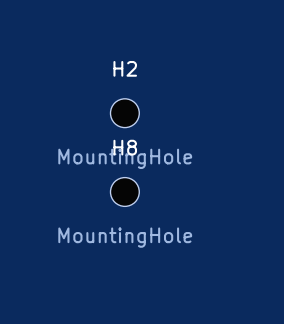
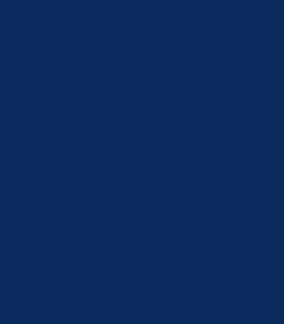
H2: MountingHole (124, 113) -> none
H8: MountingHole (124, 191) -> none

